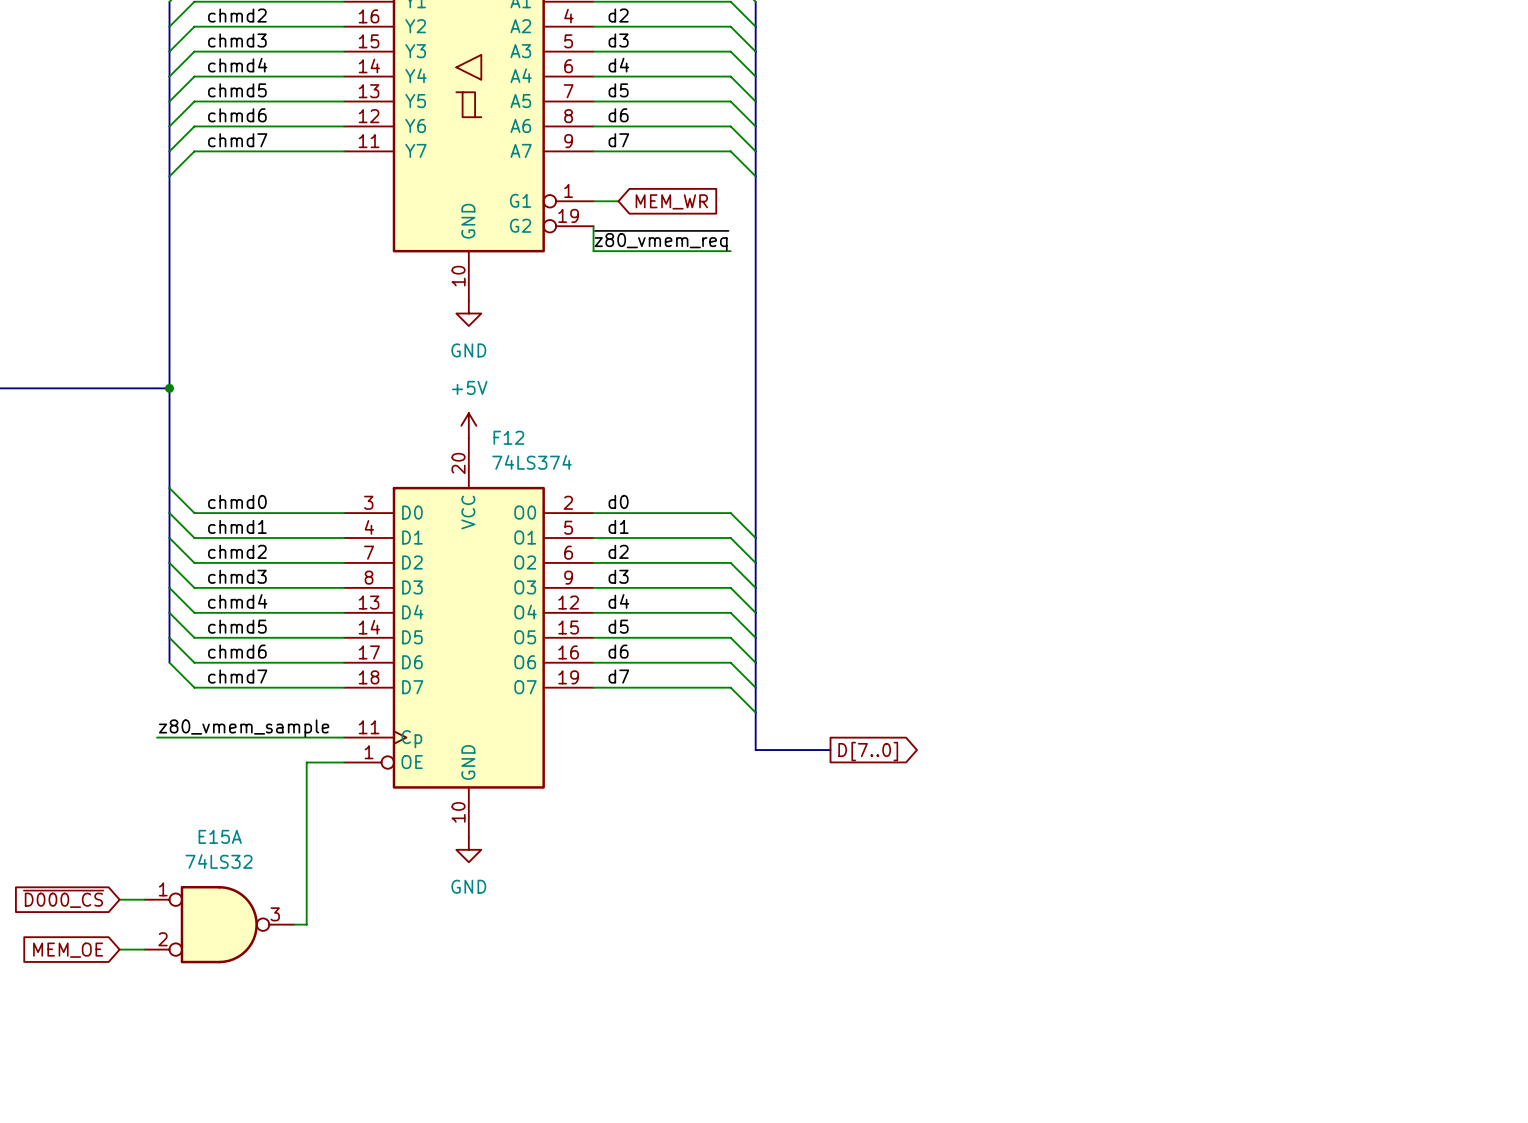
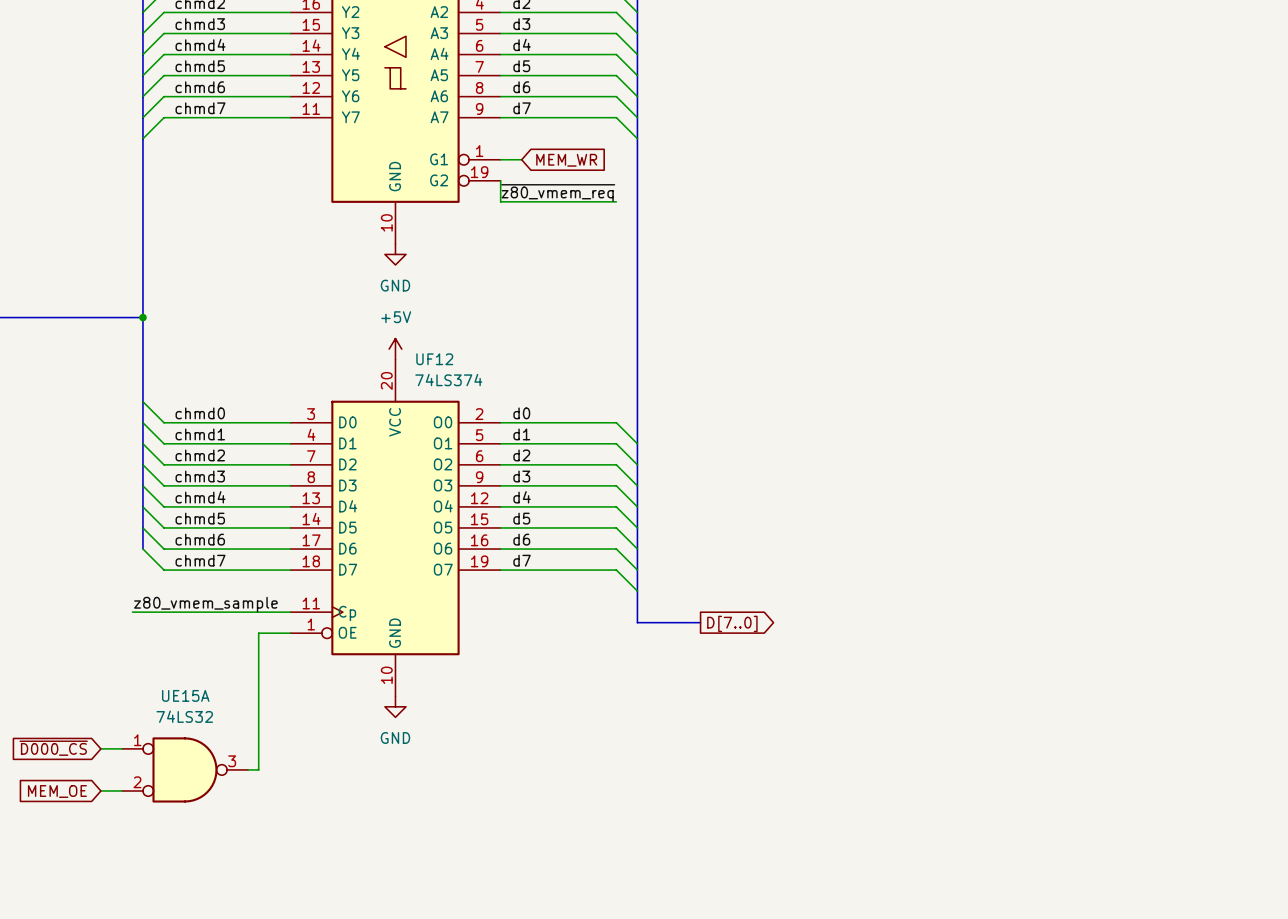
F12 name: F12 (508, 437) -> UF12 (434, 359)
E15A name: E15A (220, 836) -> UE15A (185, 695)

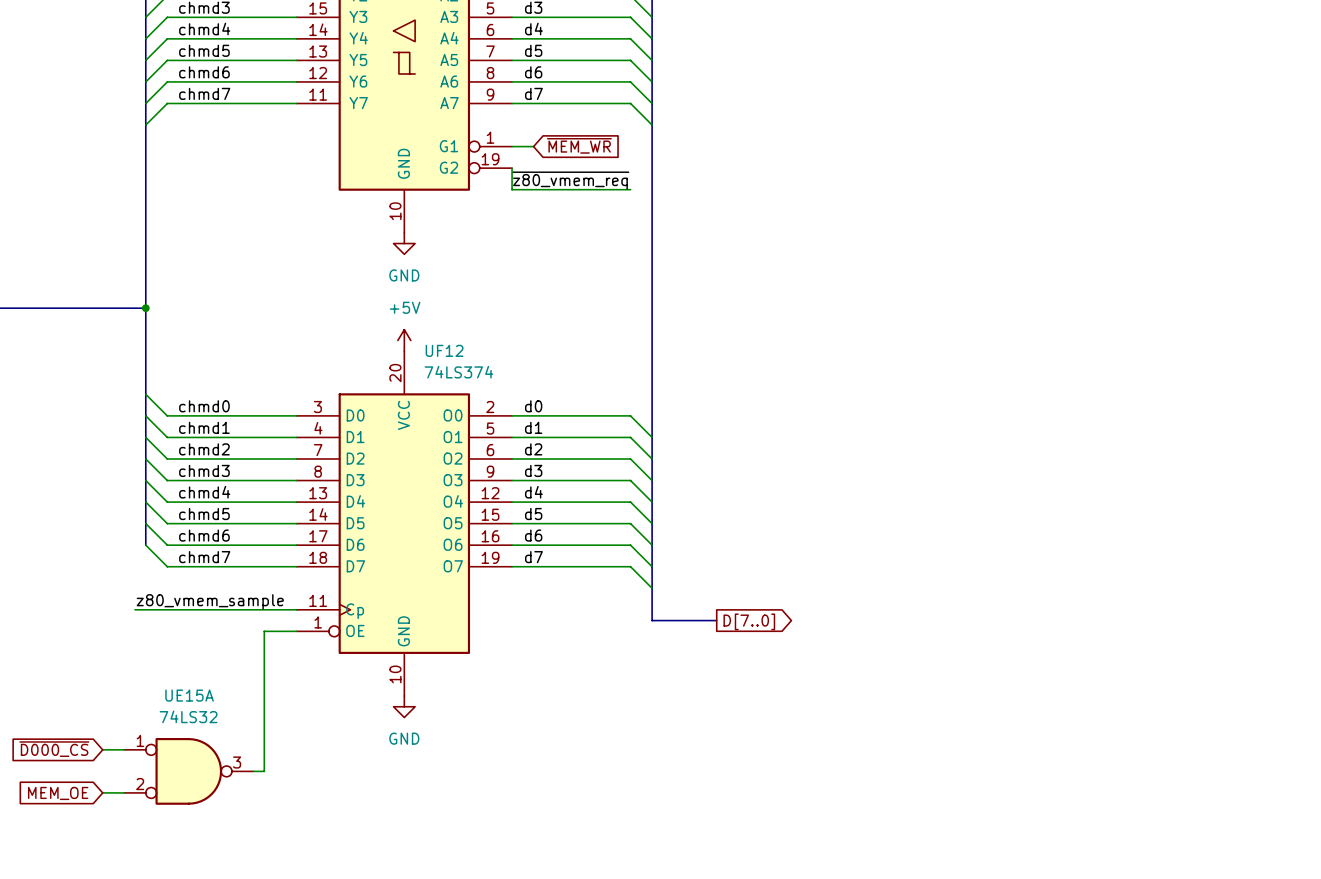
global label: MEM_WR (566, 160) -> ~{MEM_WR} (579, 145)

